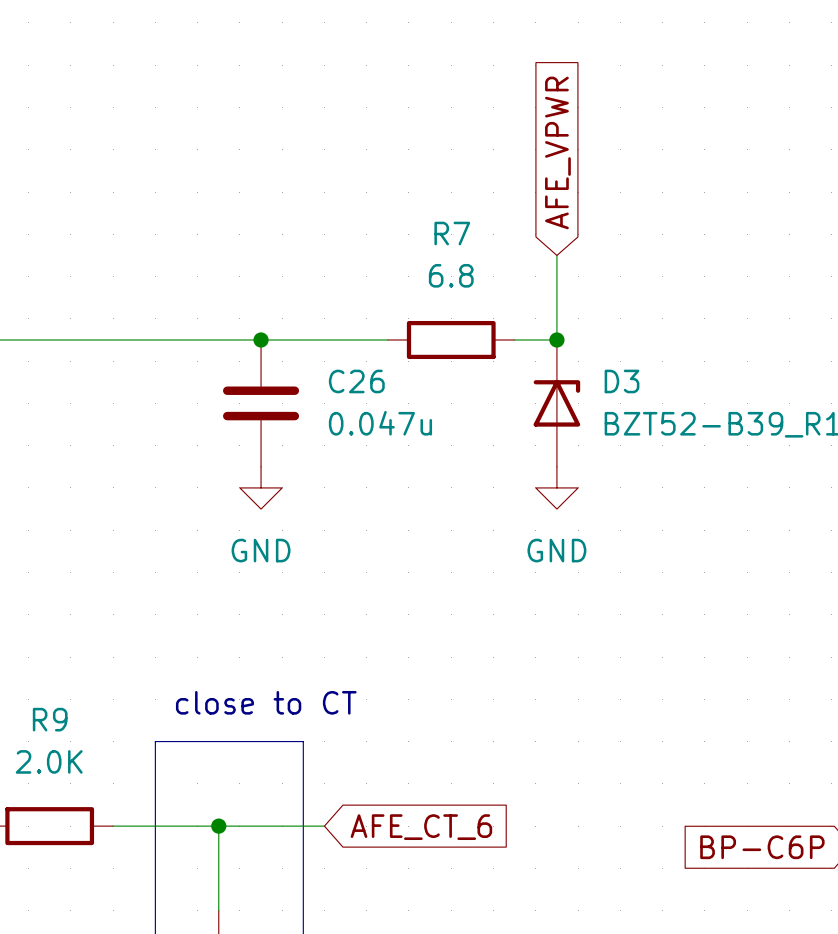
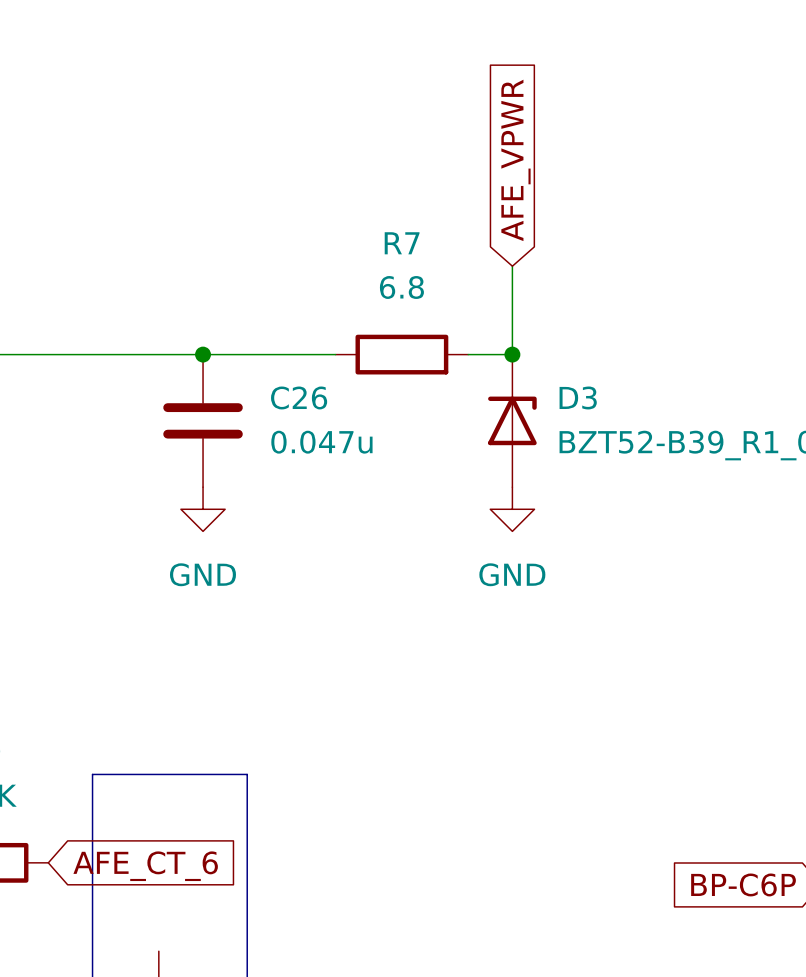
text: close to CT (266, 702) -> none
wire: (113, 826) (324, 826) -> none
wire: (218, 826) (218, 910) -> none
junction: (218, 826) -> none
global label position: AFE_CT_6 (421, 827) -> AFE_CT_6 (145, 866)

